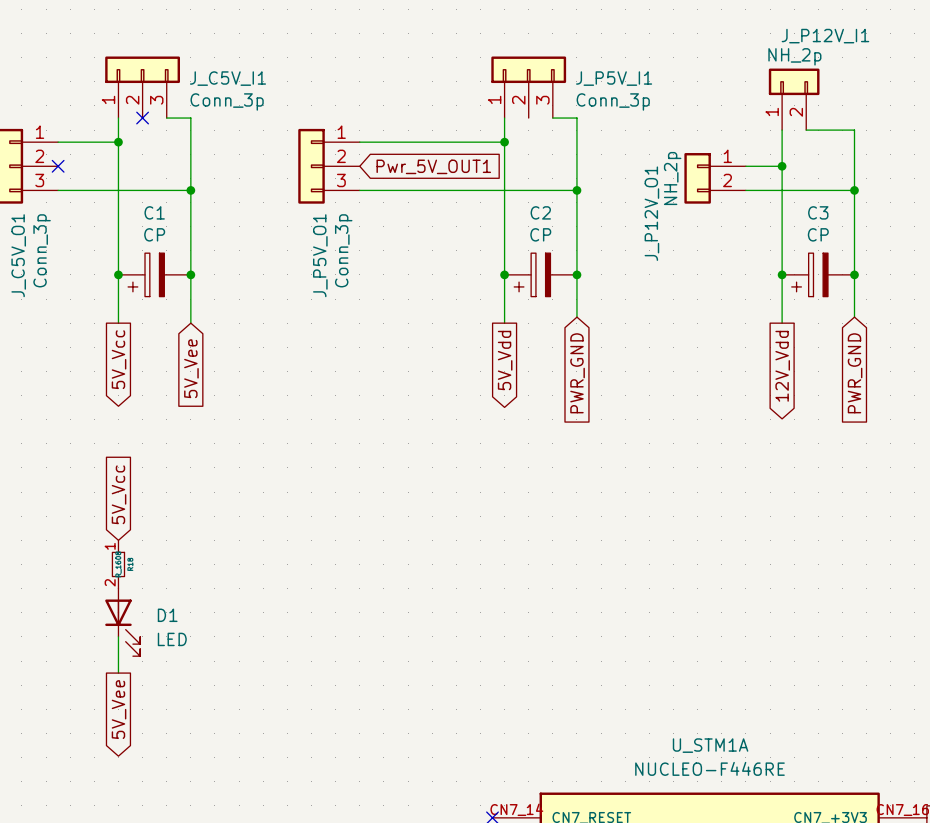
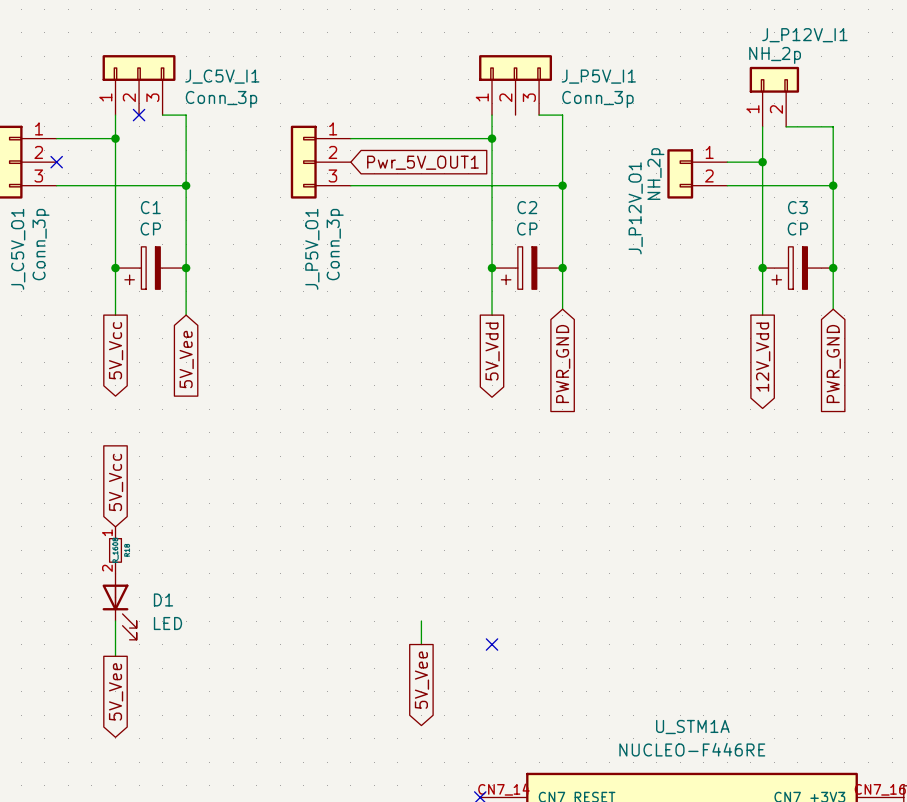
wire: none -> (421, 621) (421, 644)
no-connect mark: none -> (492, 644)
global label: none -> 5V_Vee (421, 680)

